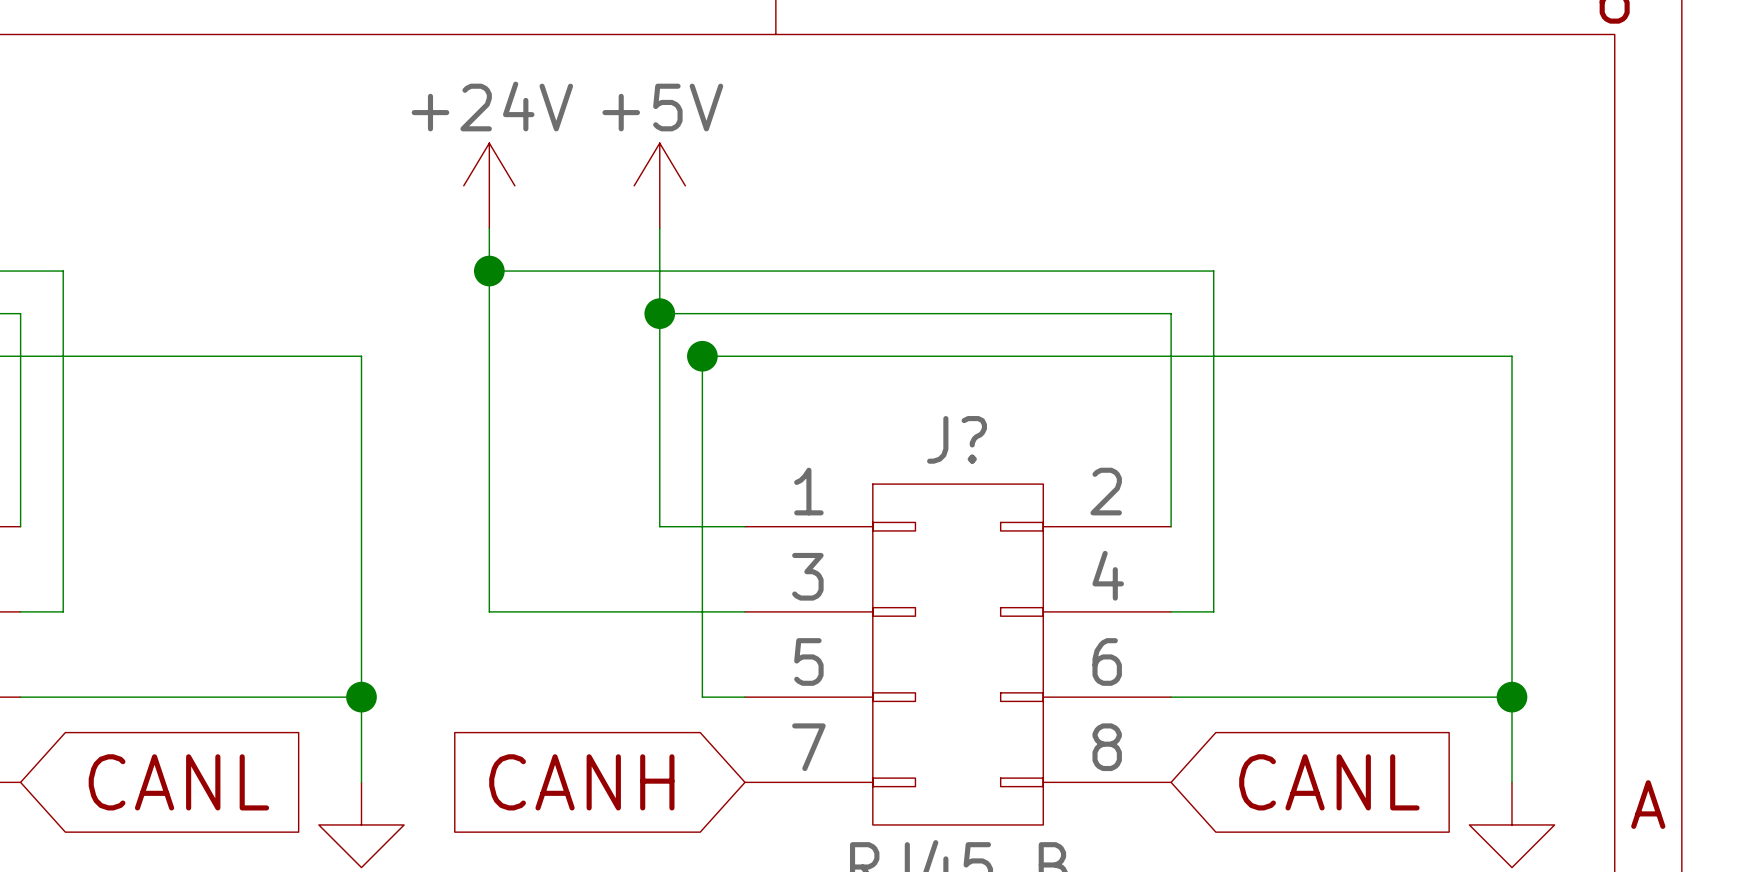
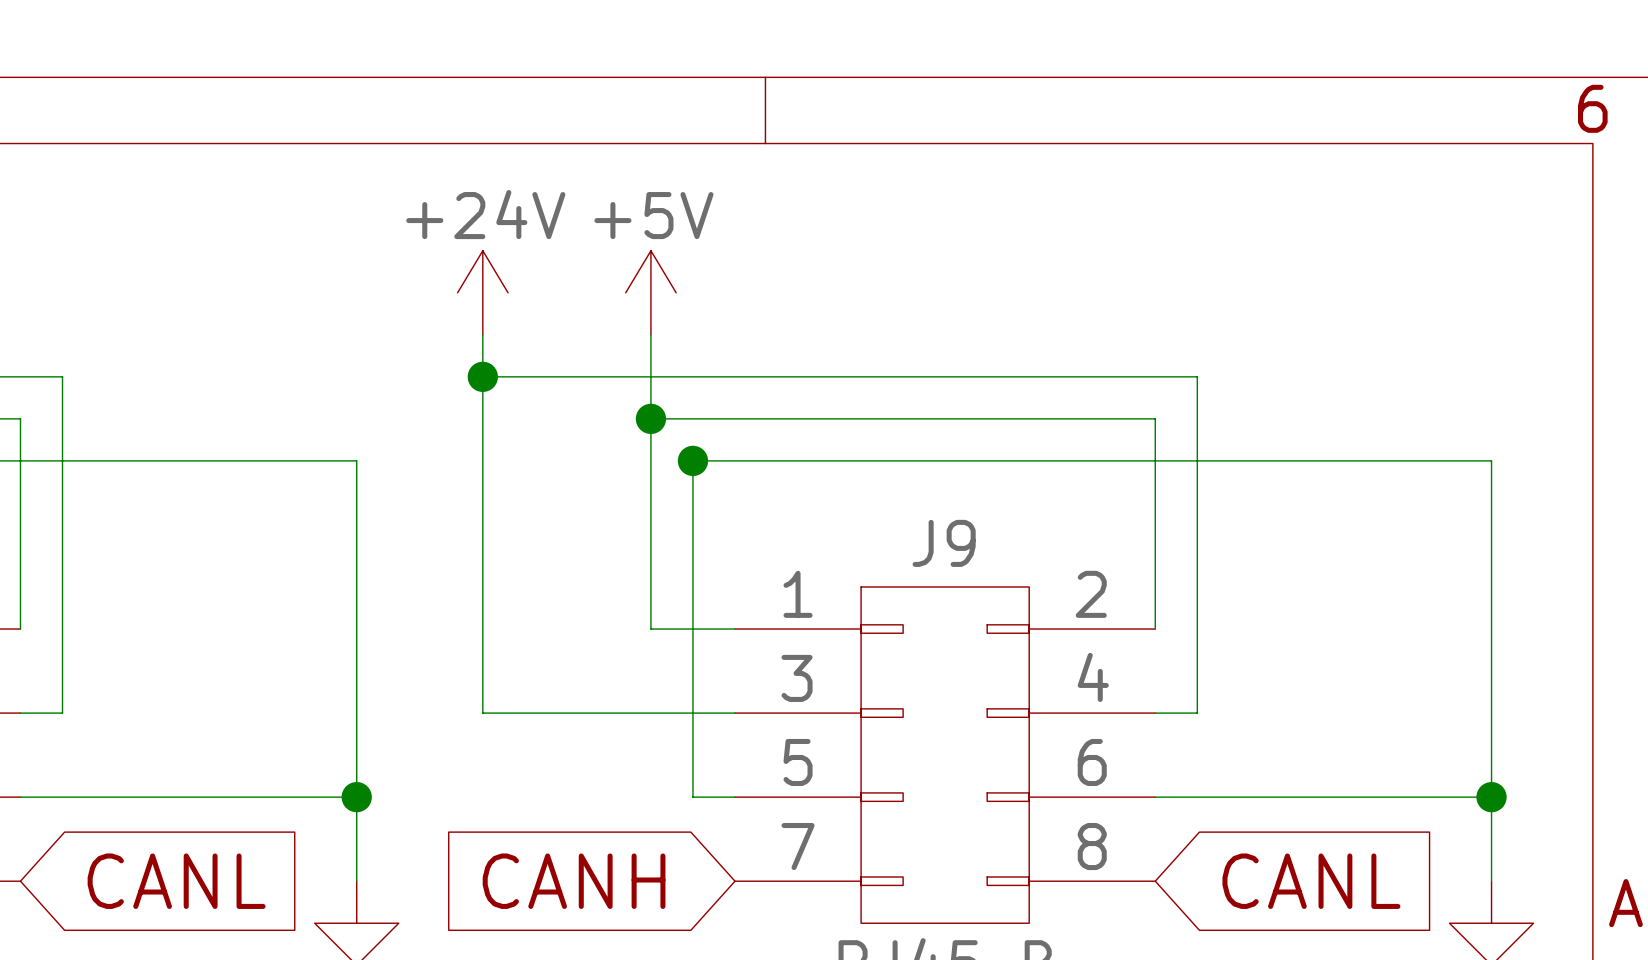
J? name: J? (957, 439) -> J9 (944, 543)

